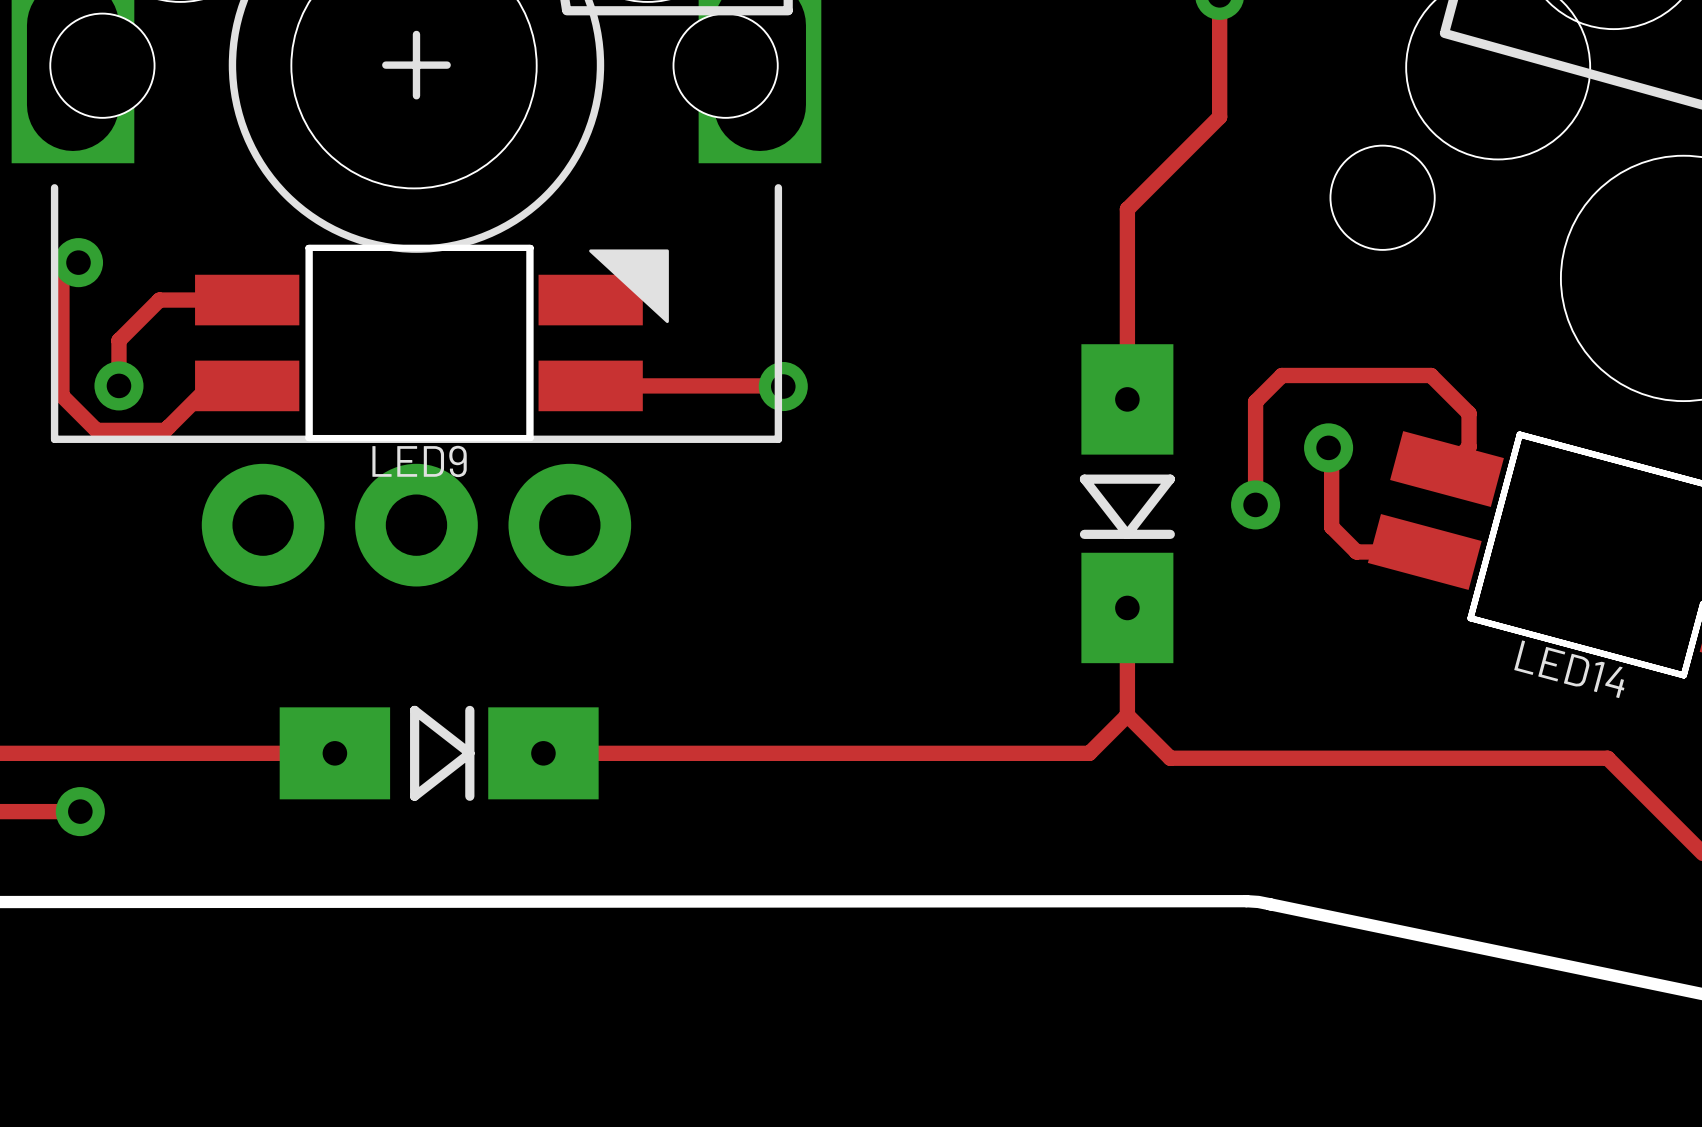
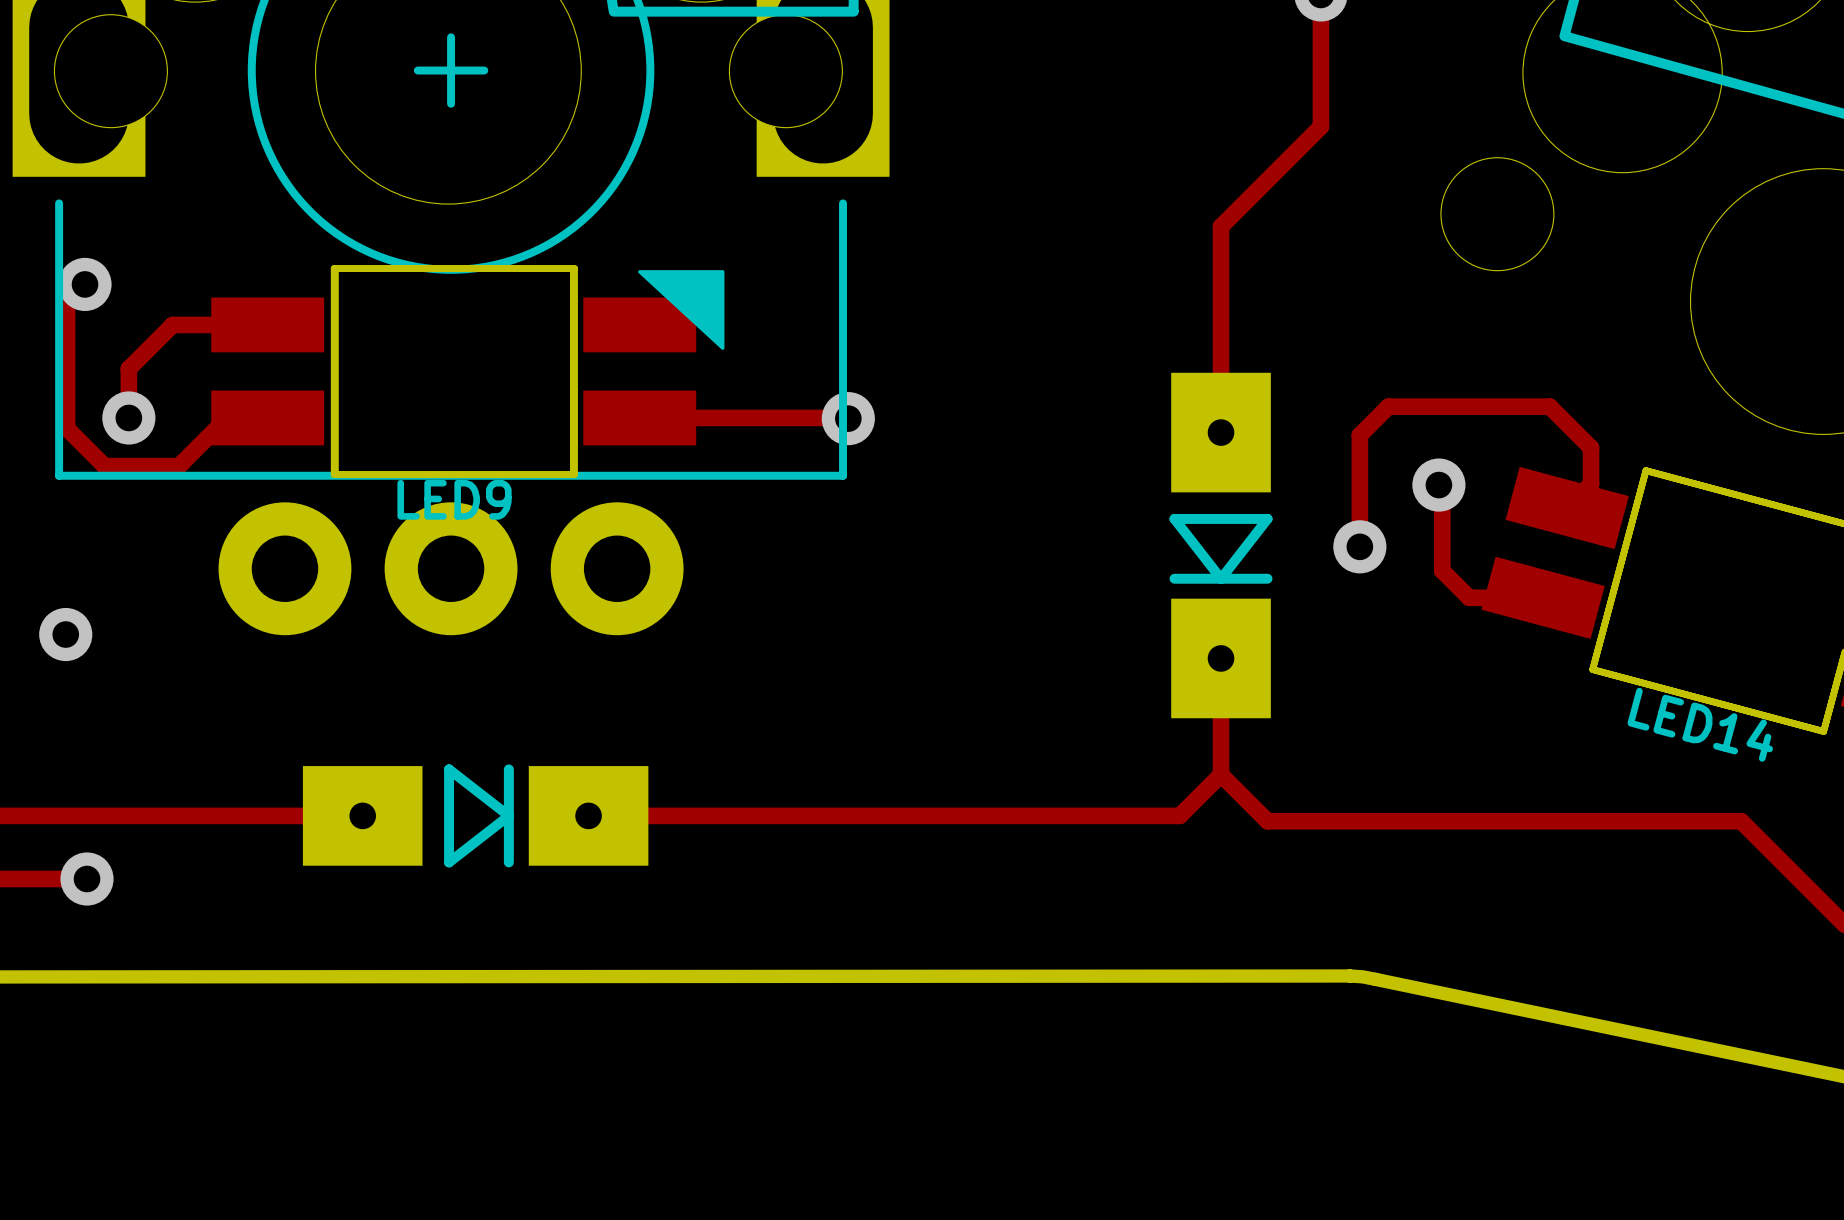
via: none -> (65, 634)

